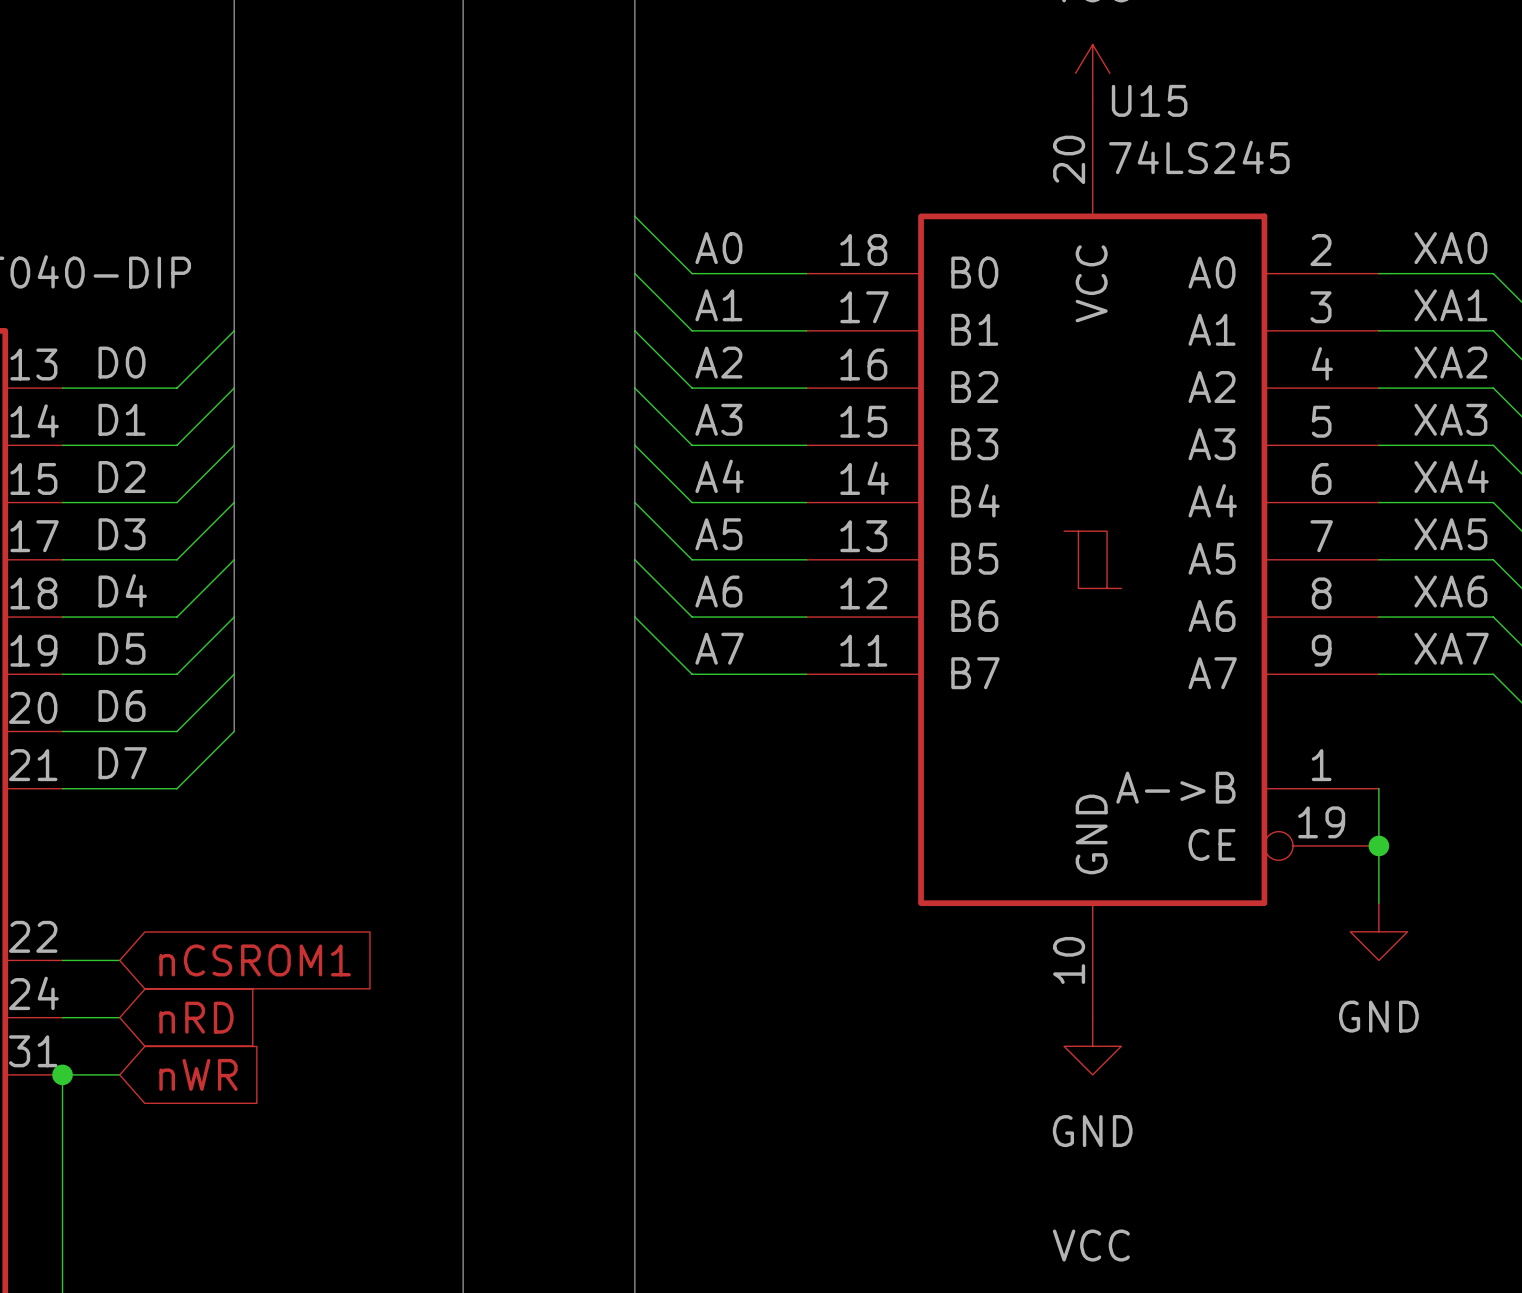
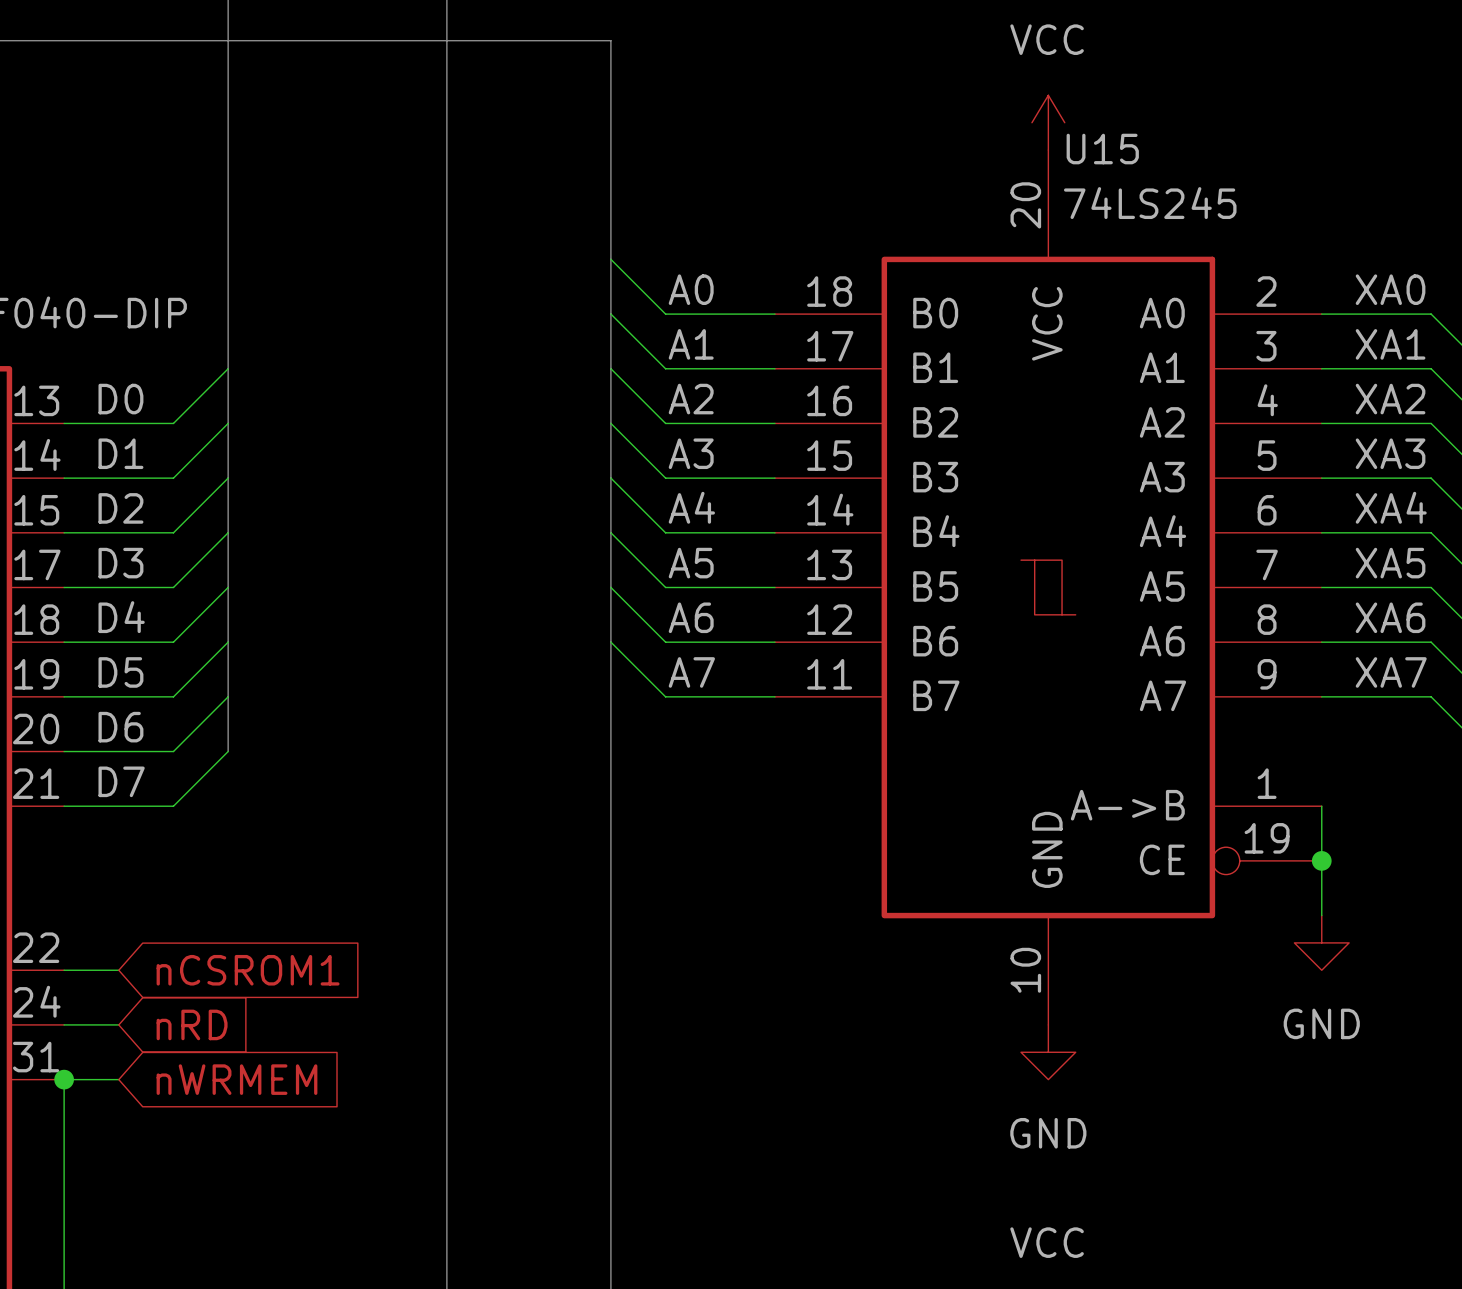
global label: nWR (198, 1074) -> nWRMEM (236, 1079)

